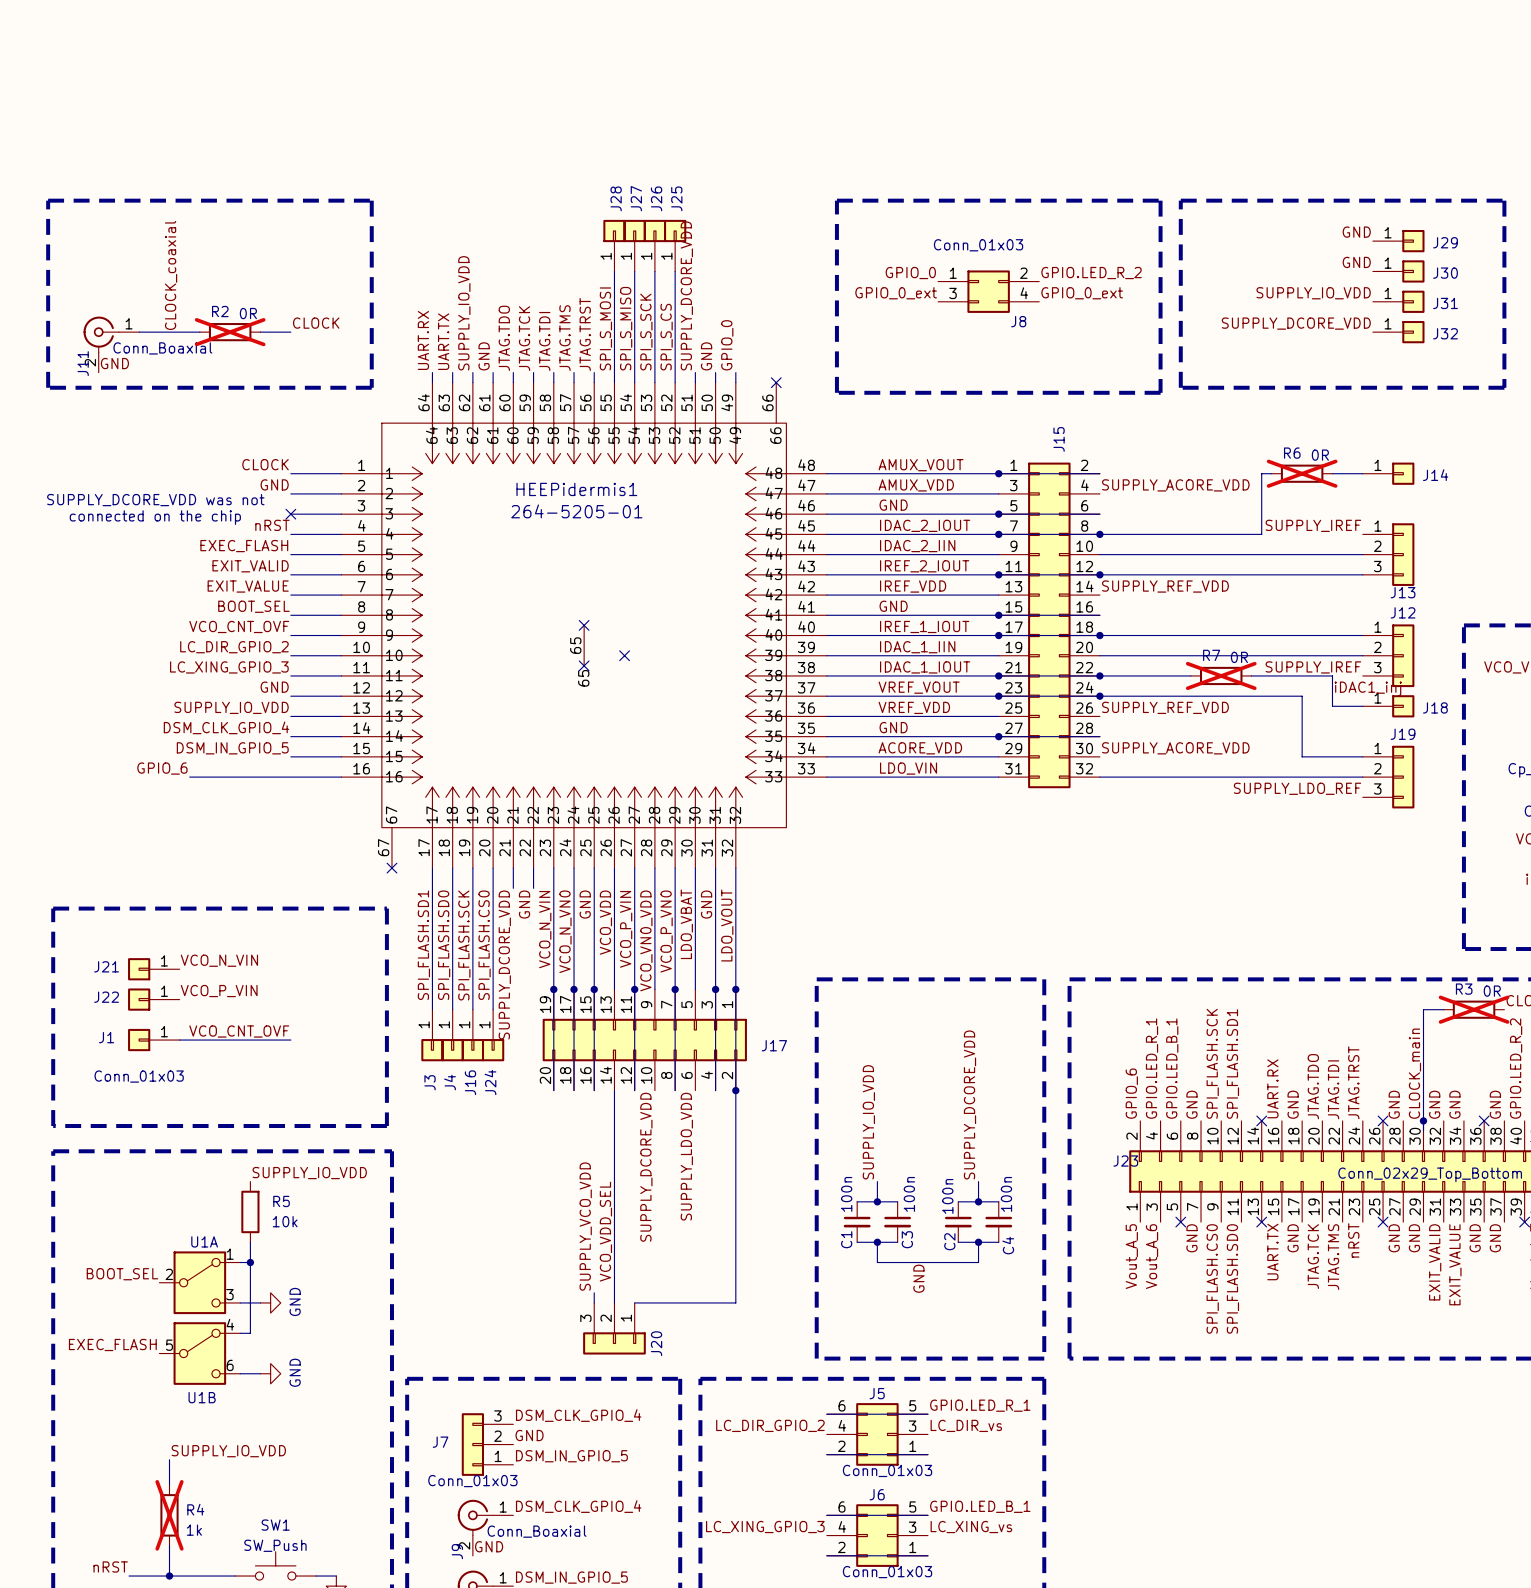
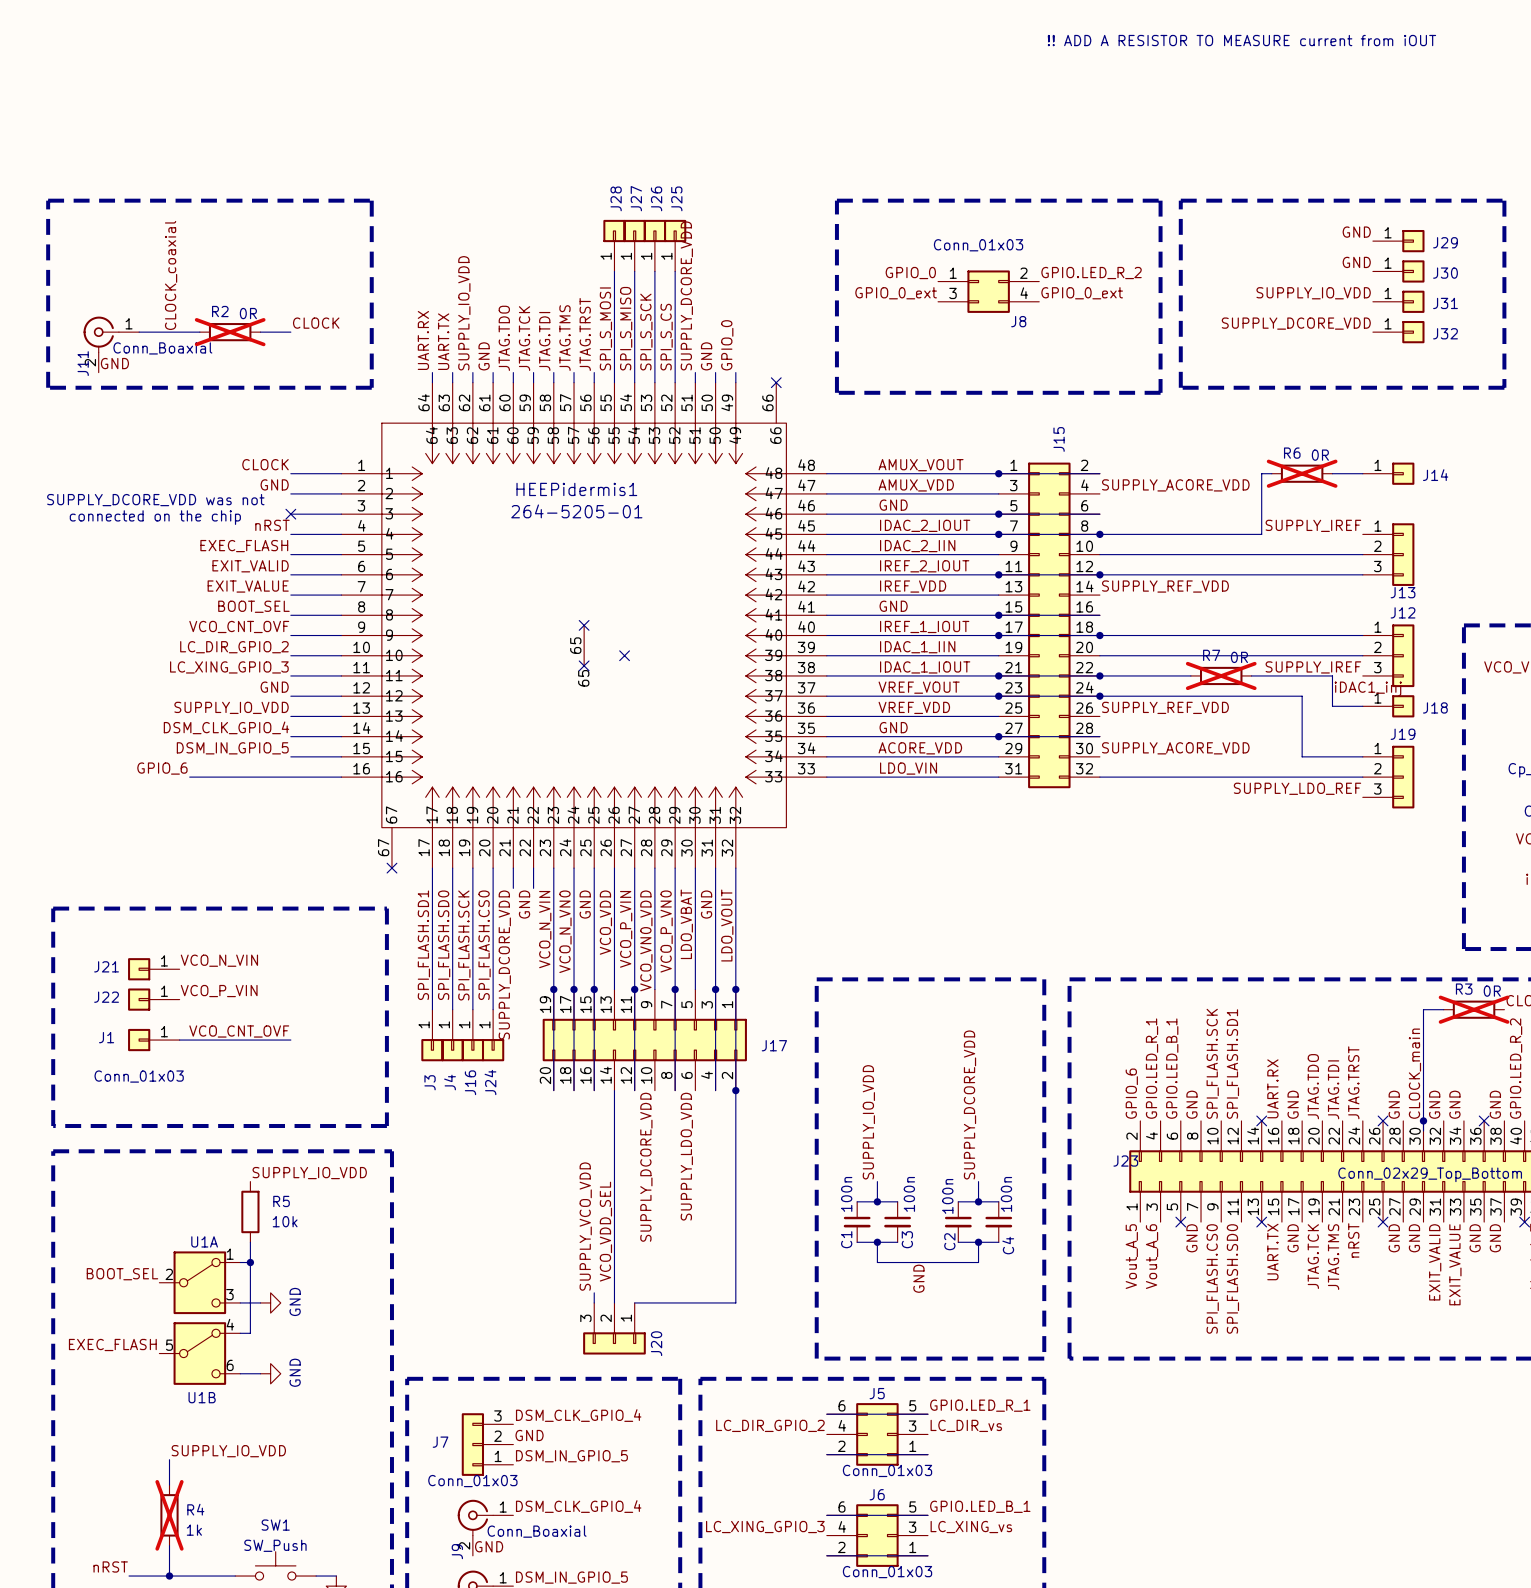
text: none -> !! ADD A RESISTOR TO MEASURE current from iOUT (1241, 40)

